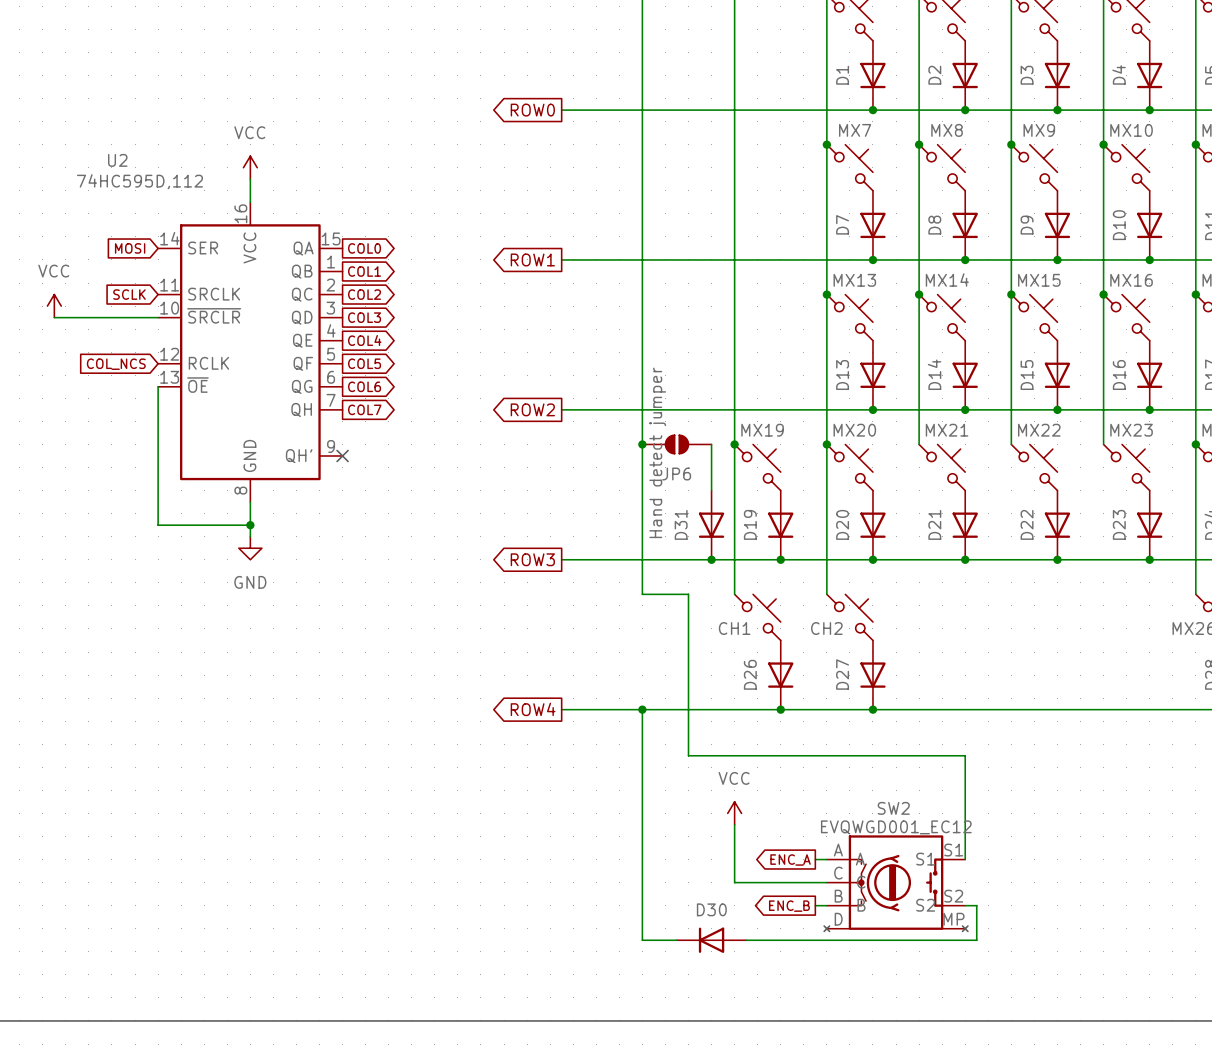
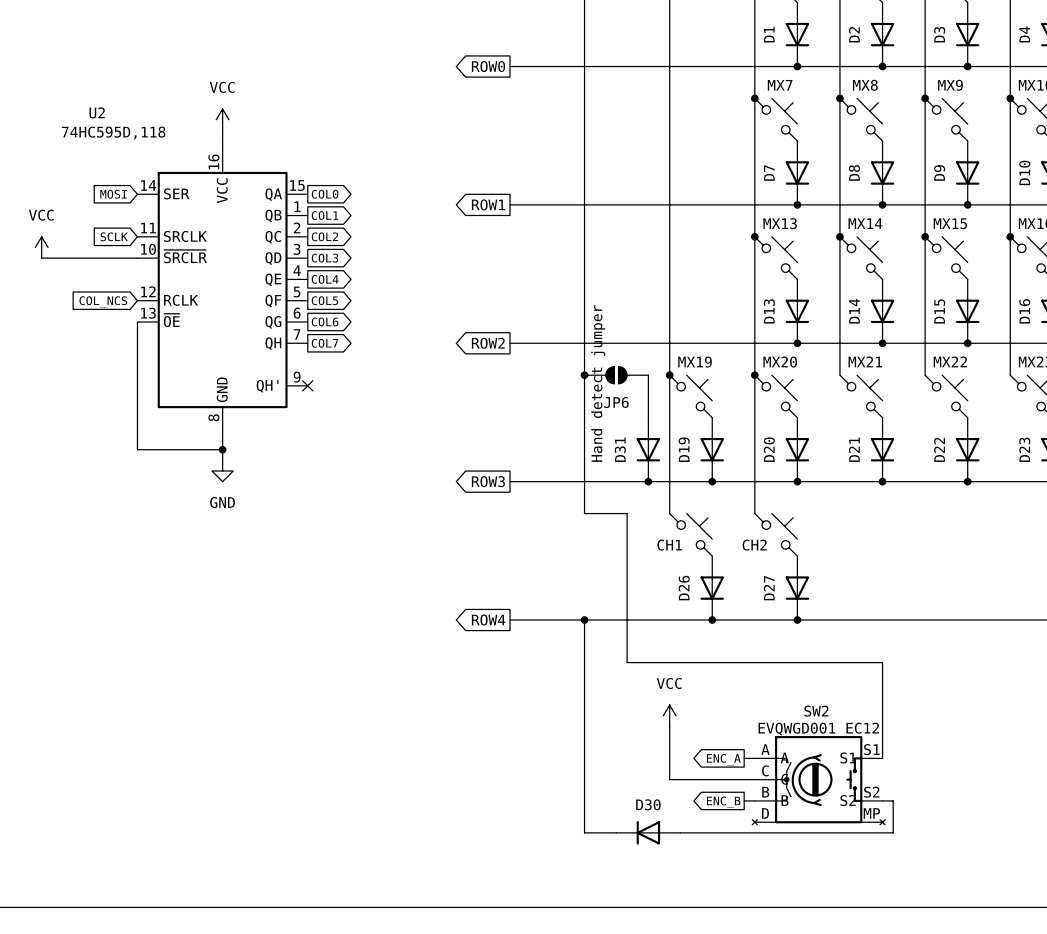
U2 value: 74HC595D,112 (139, 181) -> 74HC595D,118 (113, 133)

